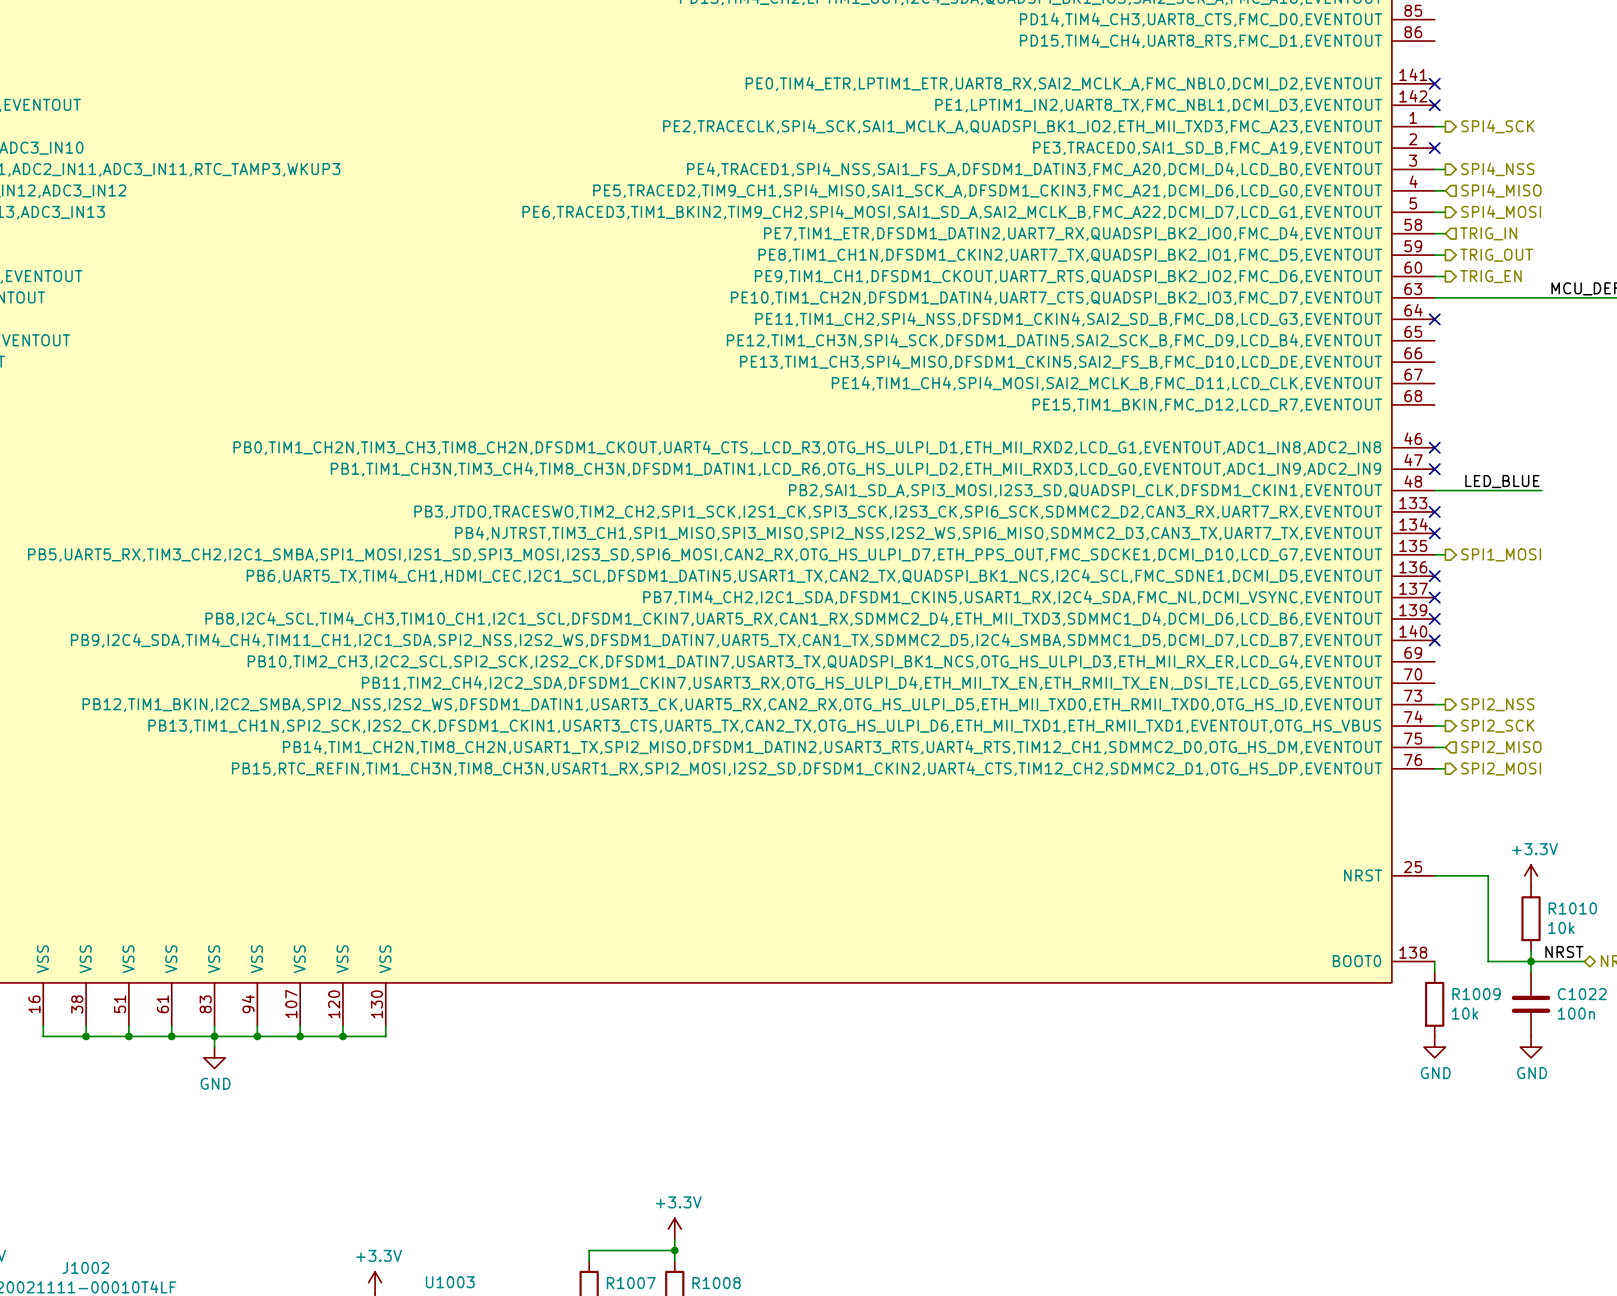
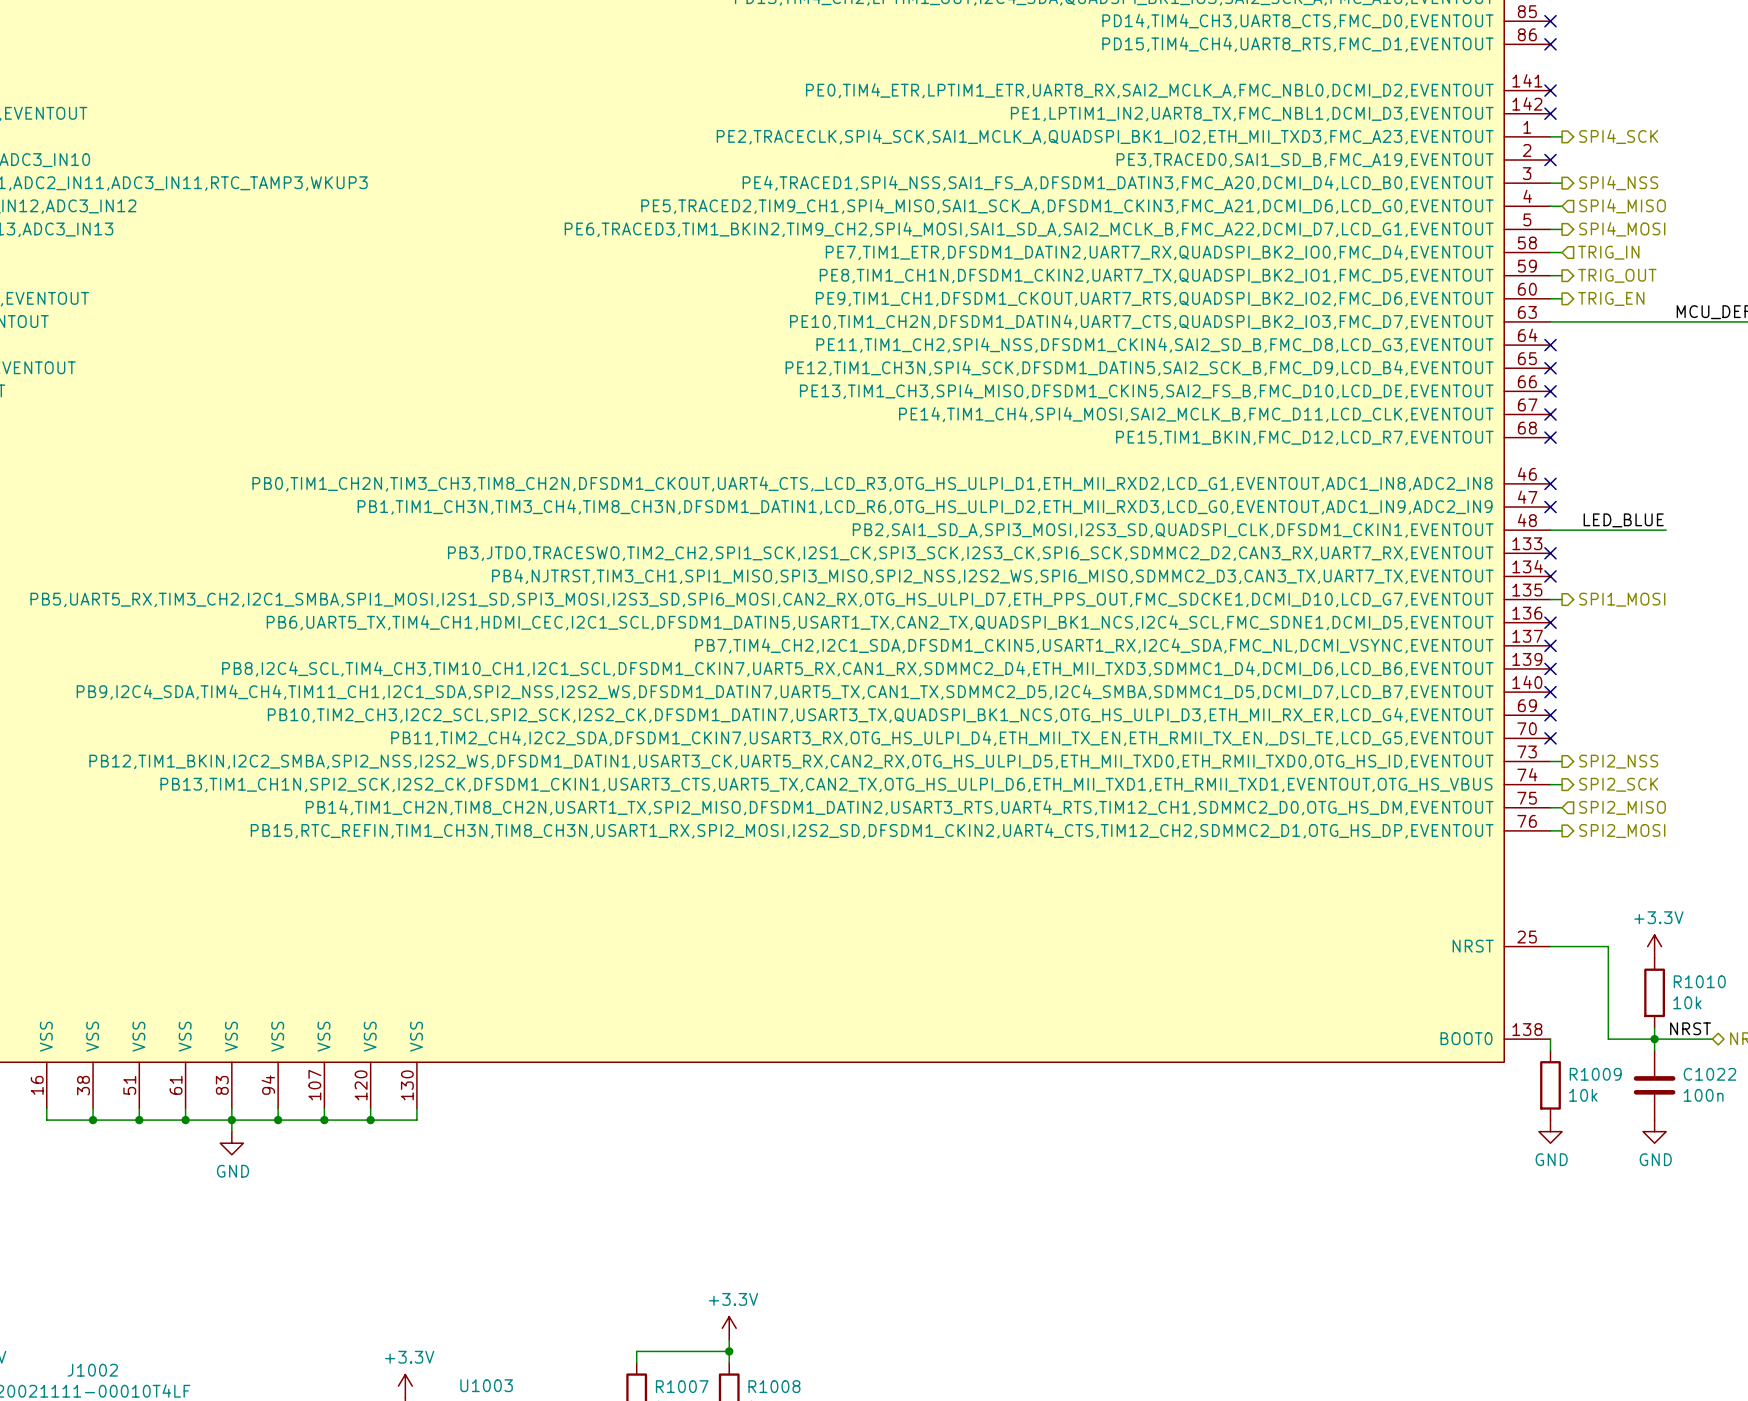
no-connect mark: none -> (1550, 21)
no-connect mark: none -> (1550, 44)
no-connect mark: none -> (1550, 368)
no-connect mark: none -> (1550, 391)
no-connect mark: none -> (1550, 414)
no-connect mark: none -> (1550, 437)
no-connect mark: none -> (1550, 715)
no-connect mark: none -> (1550, 738)

